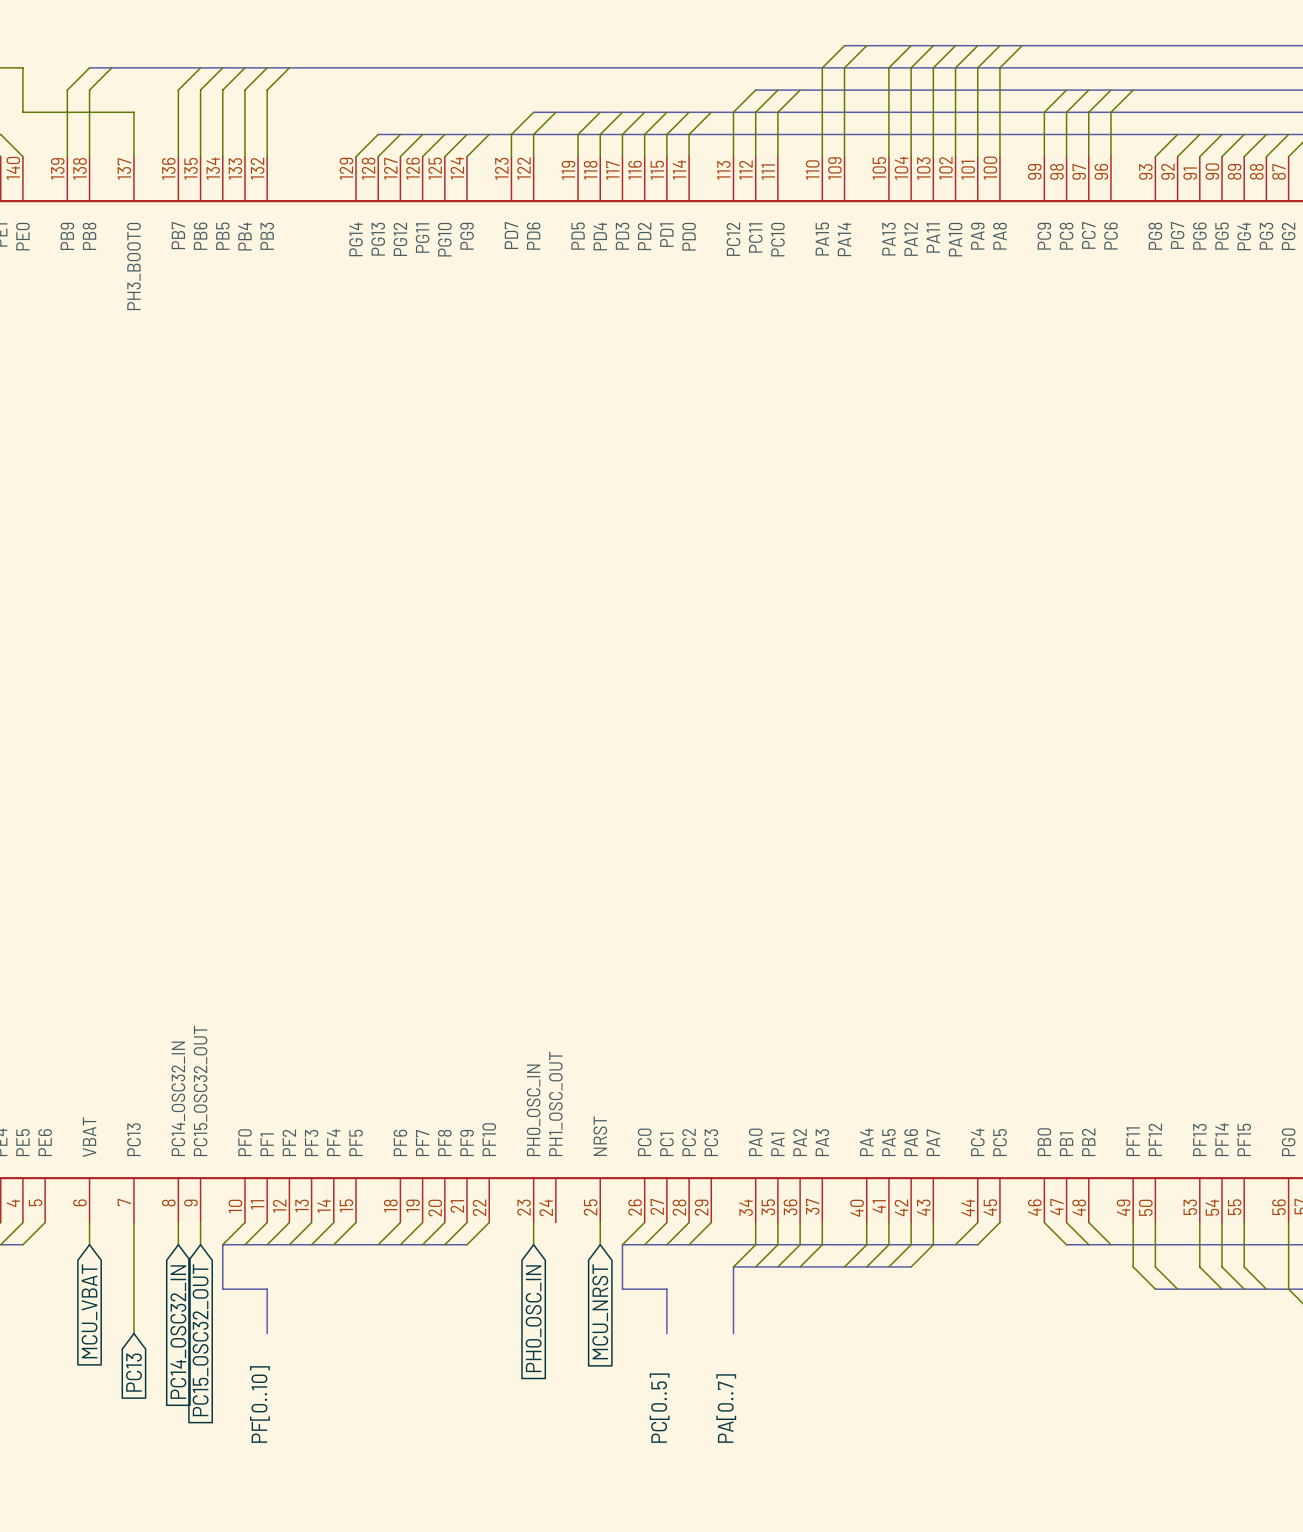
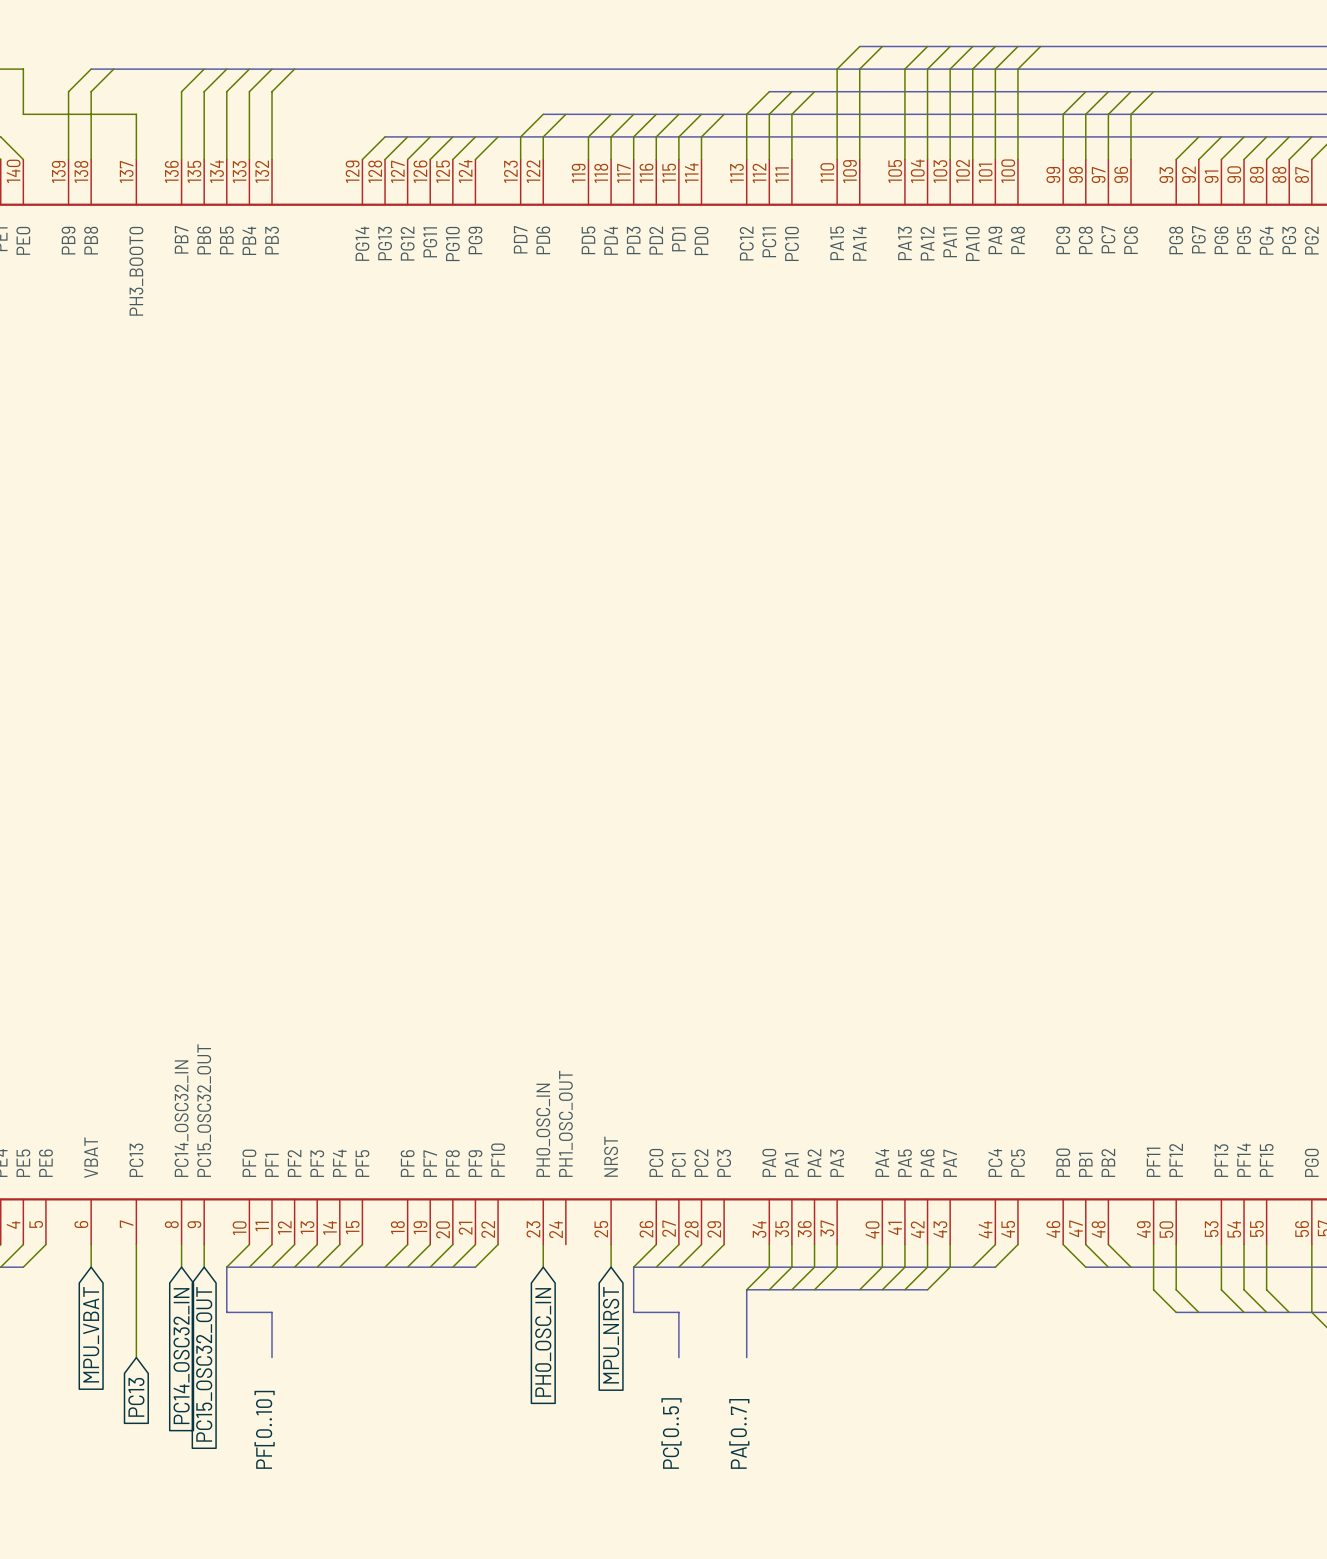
global label: MCU_VBAT (89, 1311) -> MPU_VBAT (91, 1334)
global label: MCU_NRST (600, 1311) -> MPU_NRST (611, 1335)

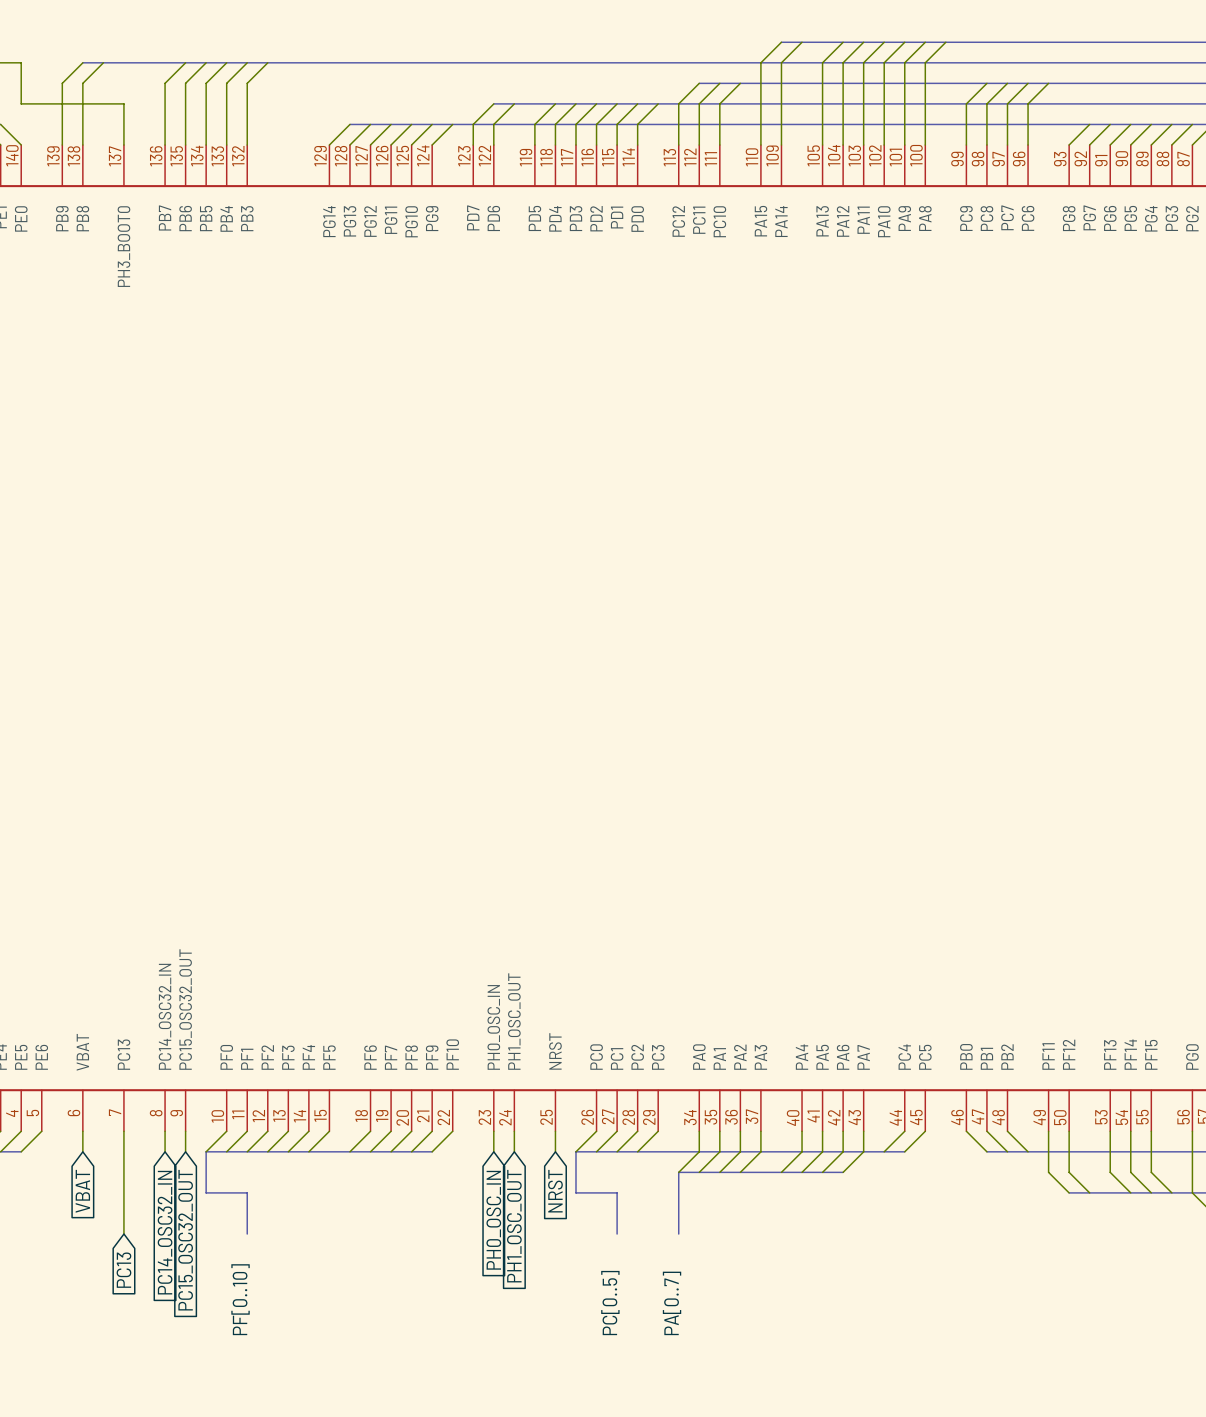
wire: none -> (514, 1131) (514, 1151)
global label: MPU_VBAT (91, 1334) -> VBAT (82, 1191)
global label: MPU_NRST (611, 1335) -> NRST (555, 1191)
global label: none -> PH1_OSC_OUT (514, 1226)

